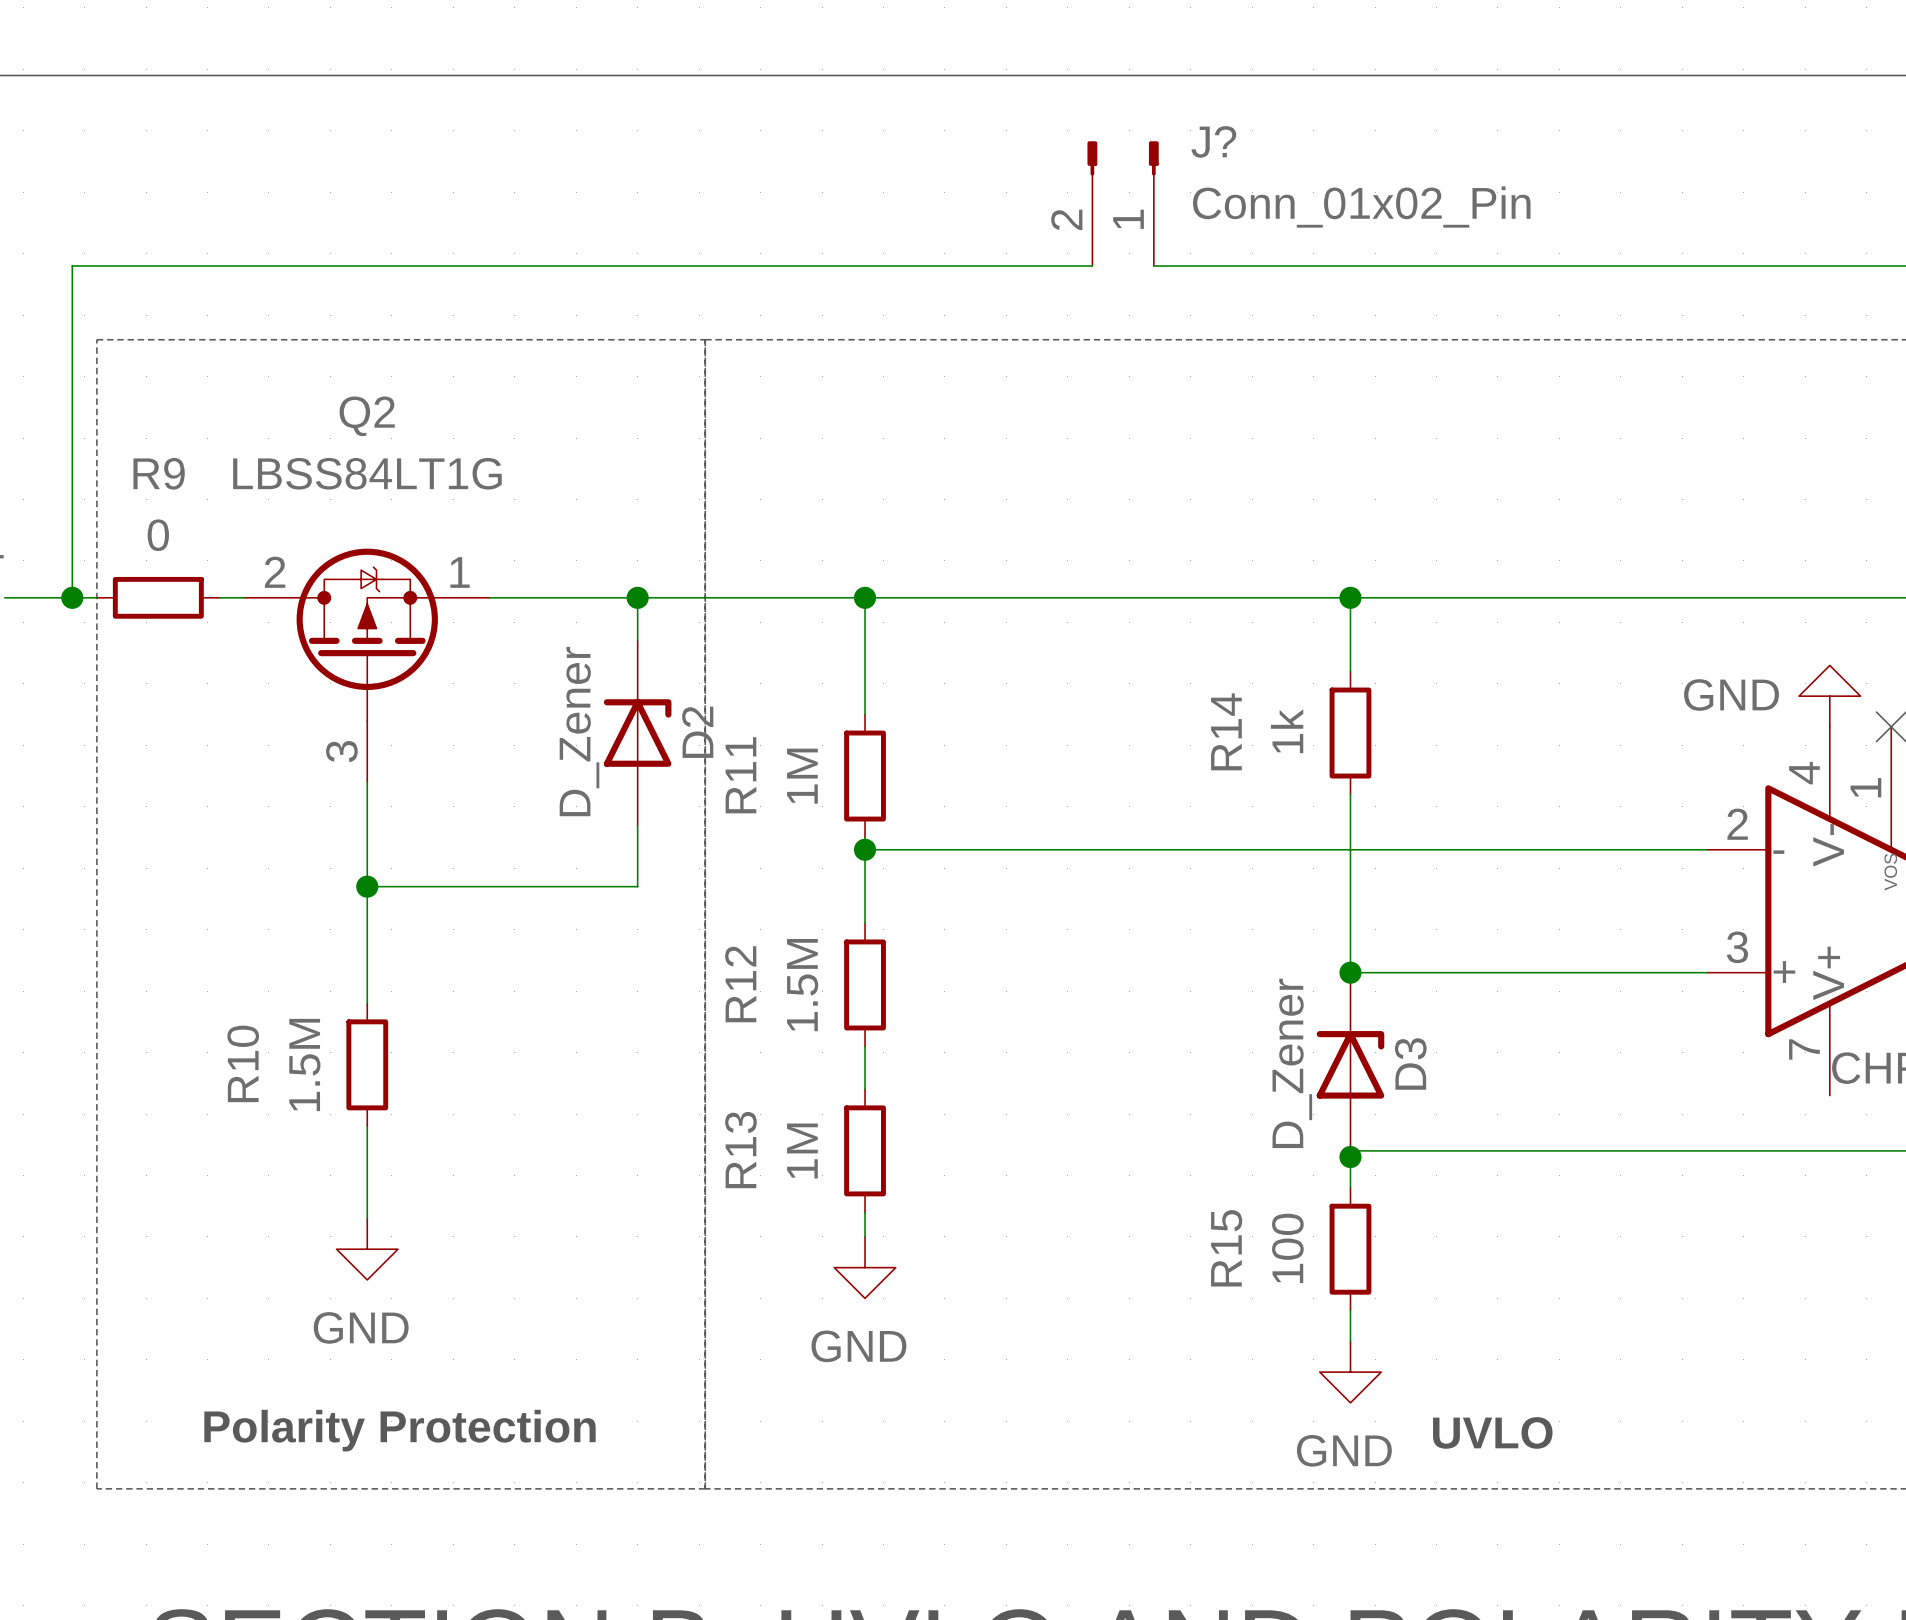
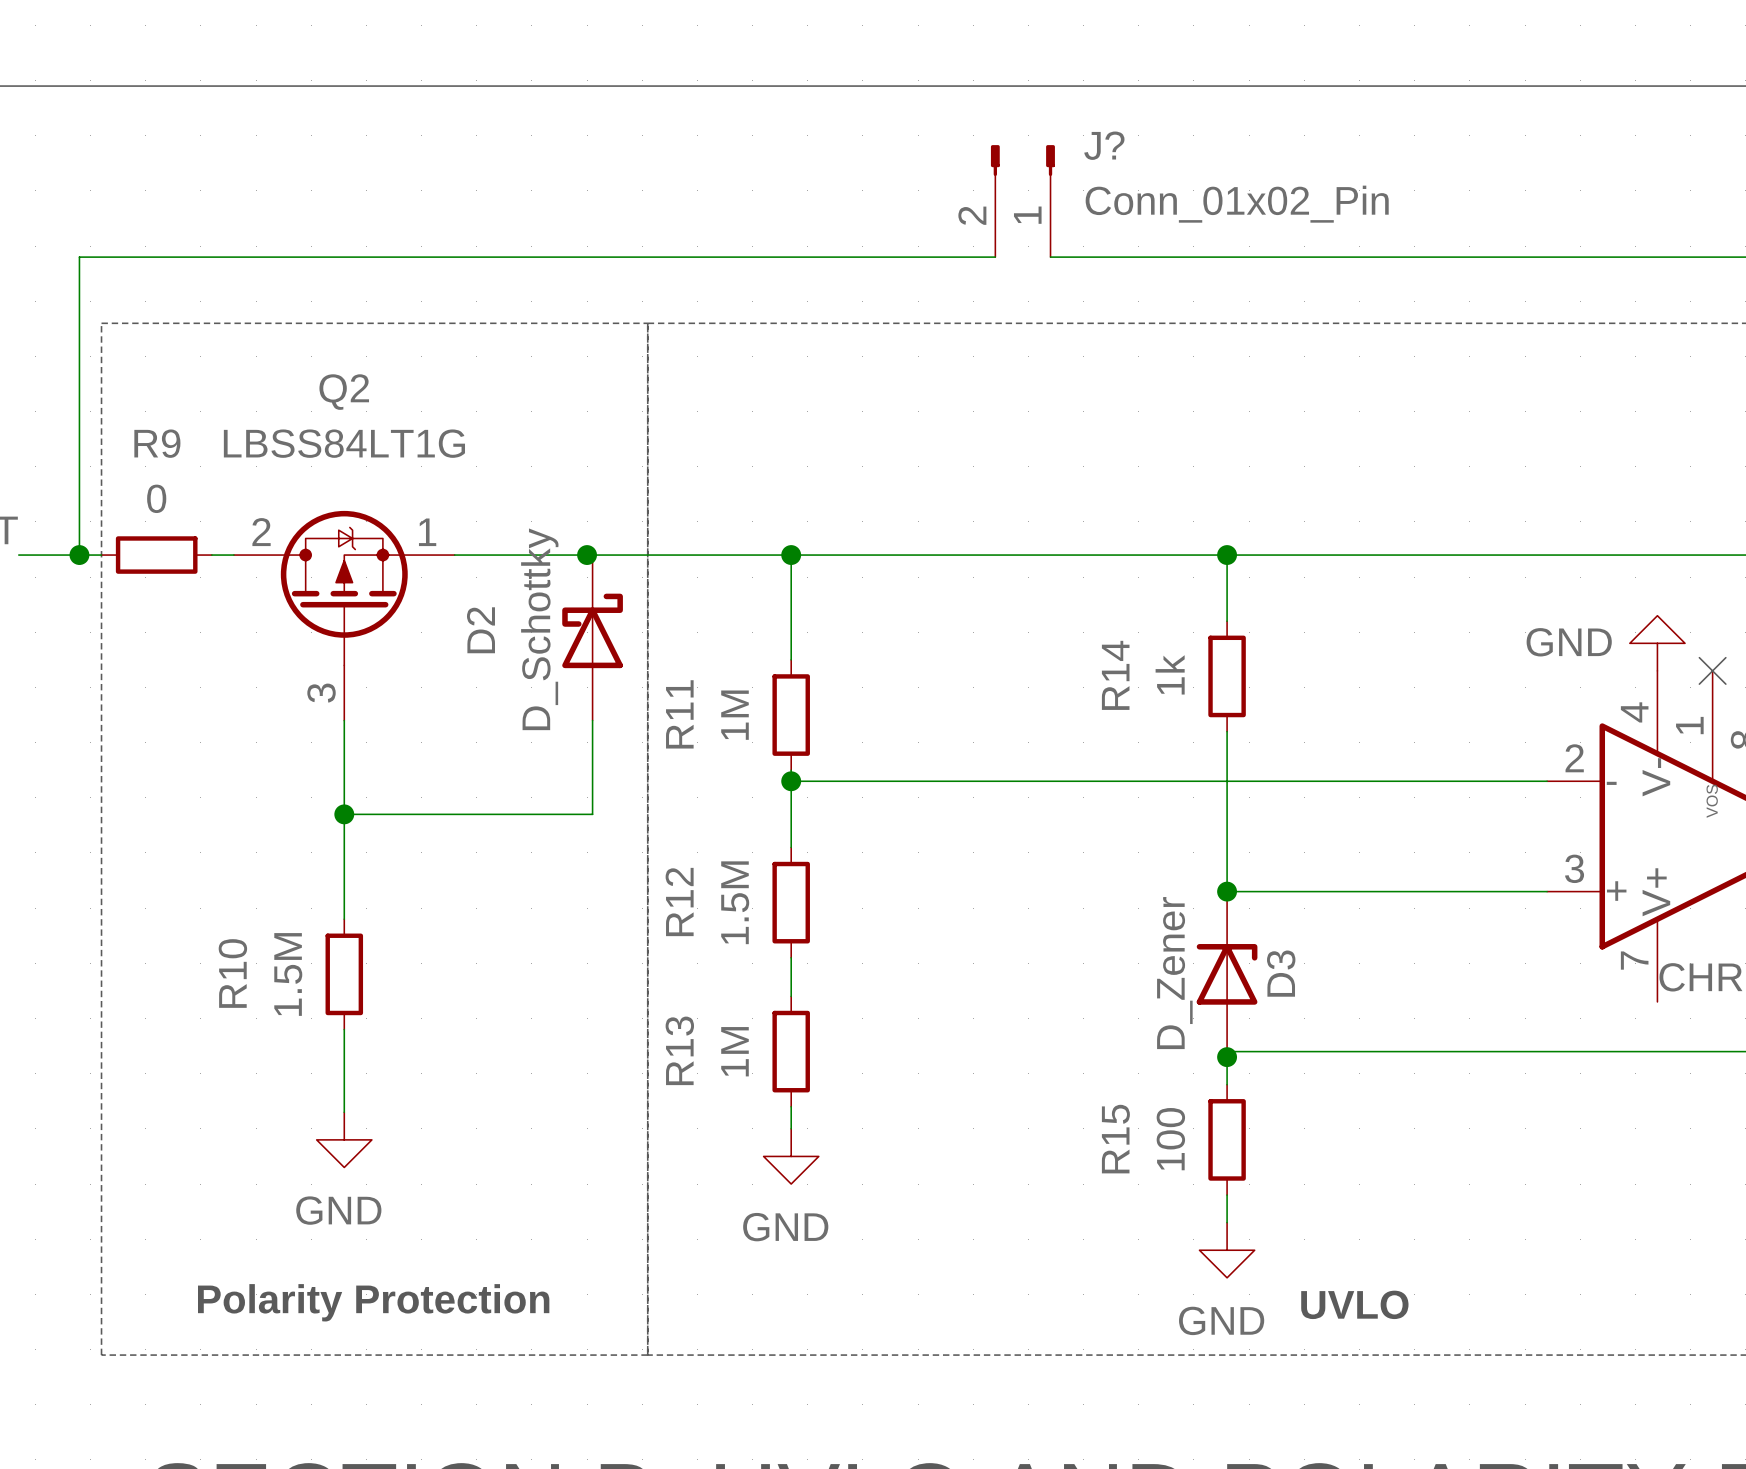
wire: (637, 597) (637, 640) -> none
D2 symbol: [603, 640, 672, 826] -> [562, 555, 623, 721]
D2 value: D_Zener (579, 731) -> D_Schottky (539, 629)
D2 name position: D2 (697, 732) -> D2 (480, 630)
wire: (637, 825) (637, 886) -> (592, 720) (592, 814) (587, 814)

